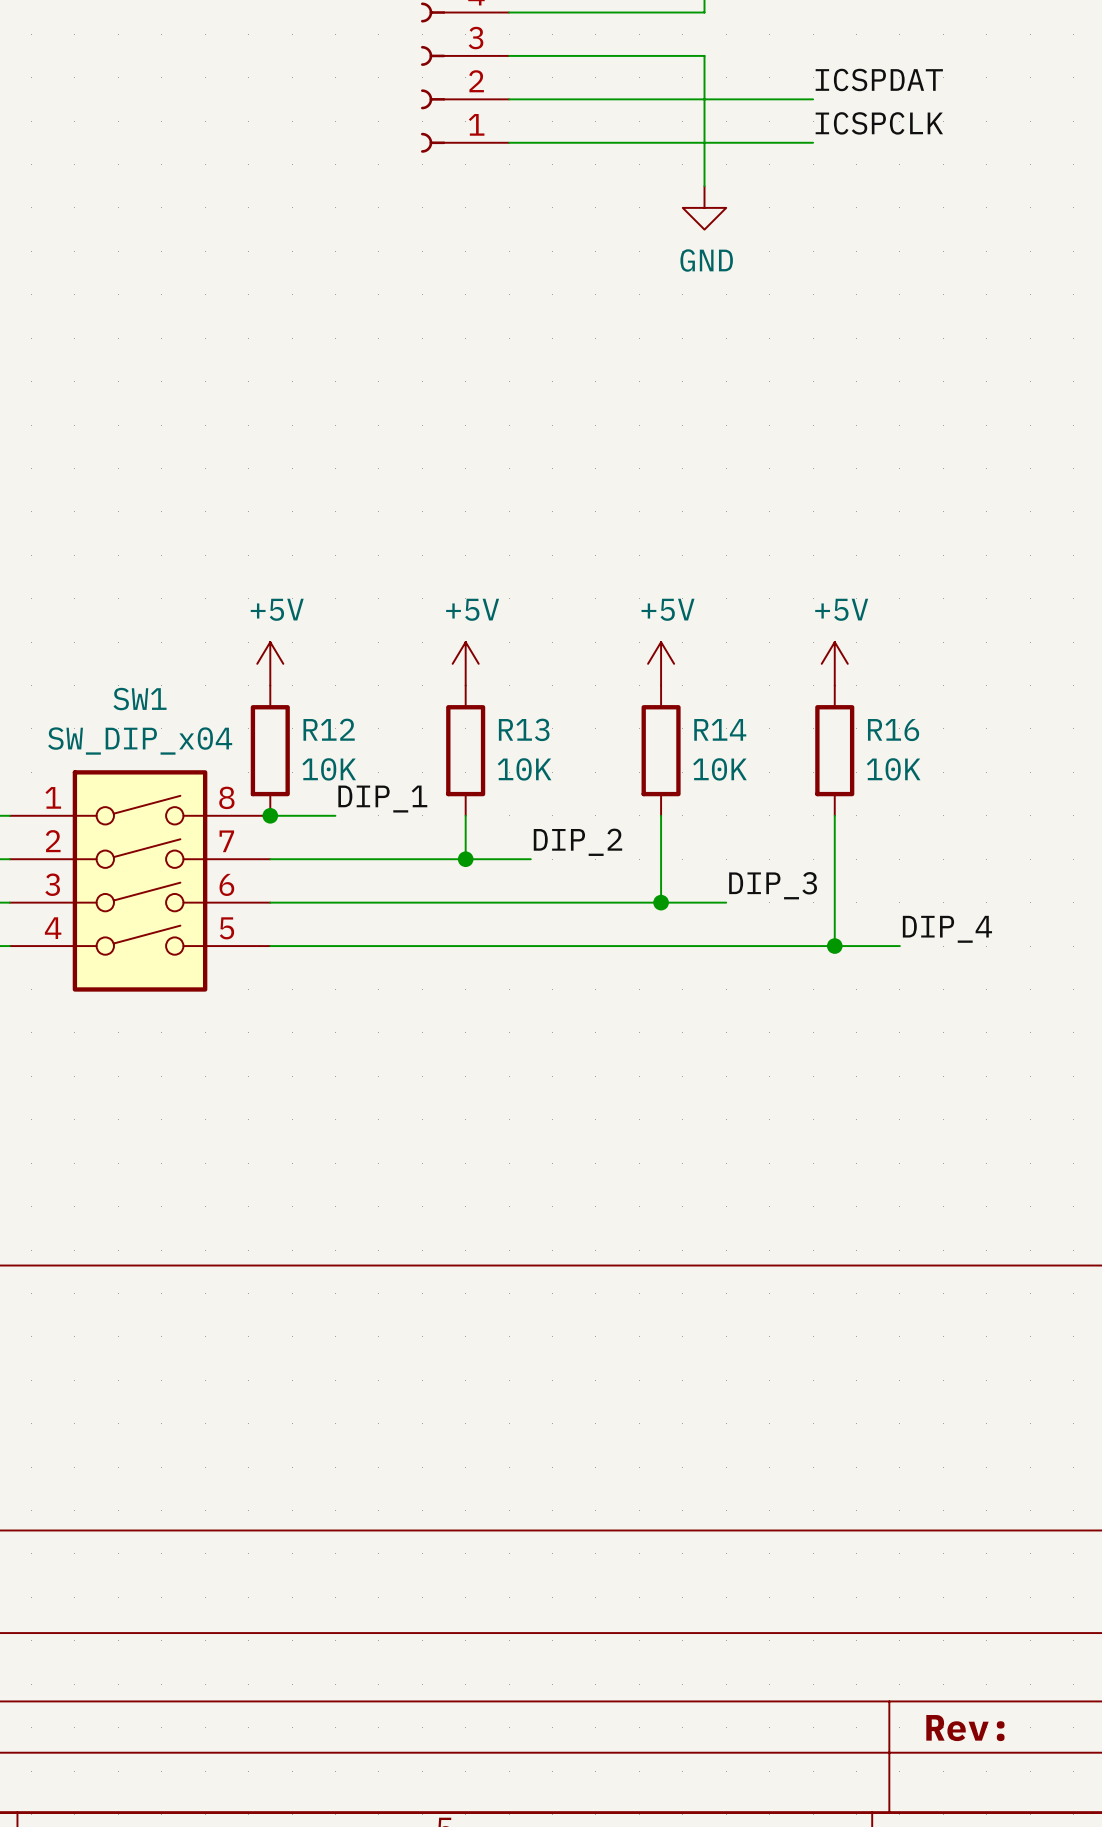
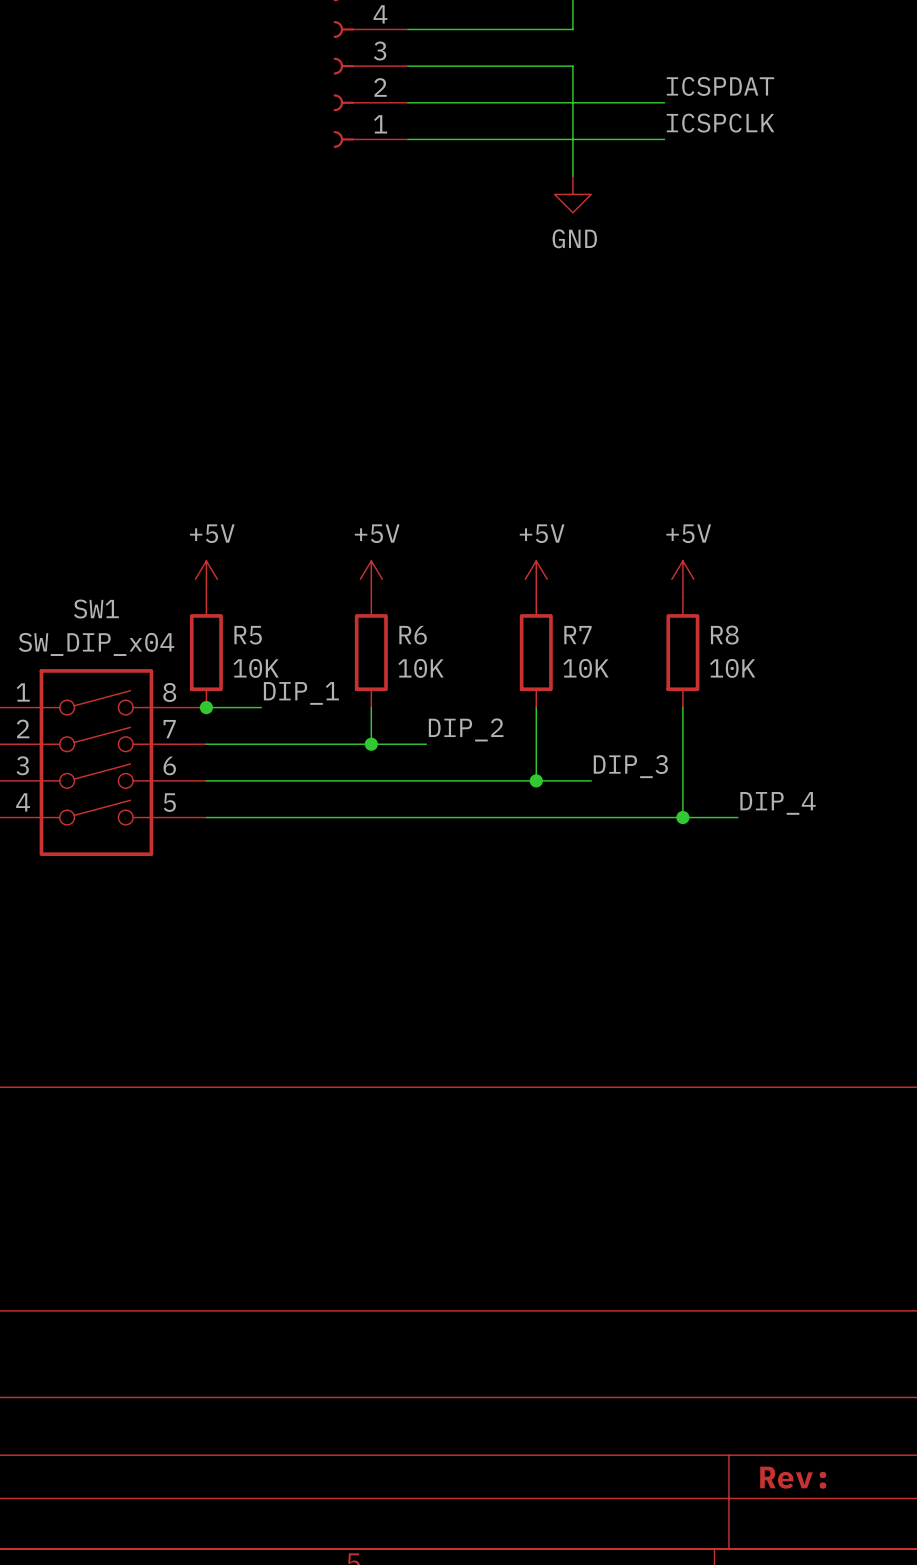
R12 name: R12 (329, 729) -> R5 (248, 635)
R13 name: R13 (524, 729) -> R6 (413, 635)
R14 name: R14 (720, 729) -> R7 (577, 635)
R16 name: R16 (893, 730) -> R8 (724, 635)

